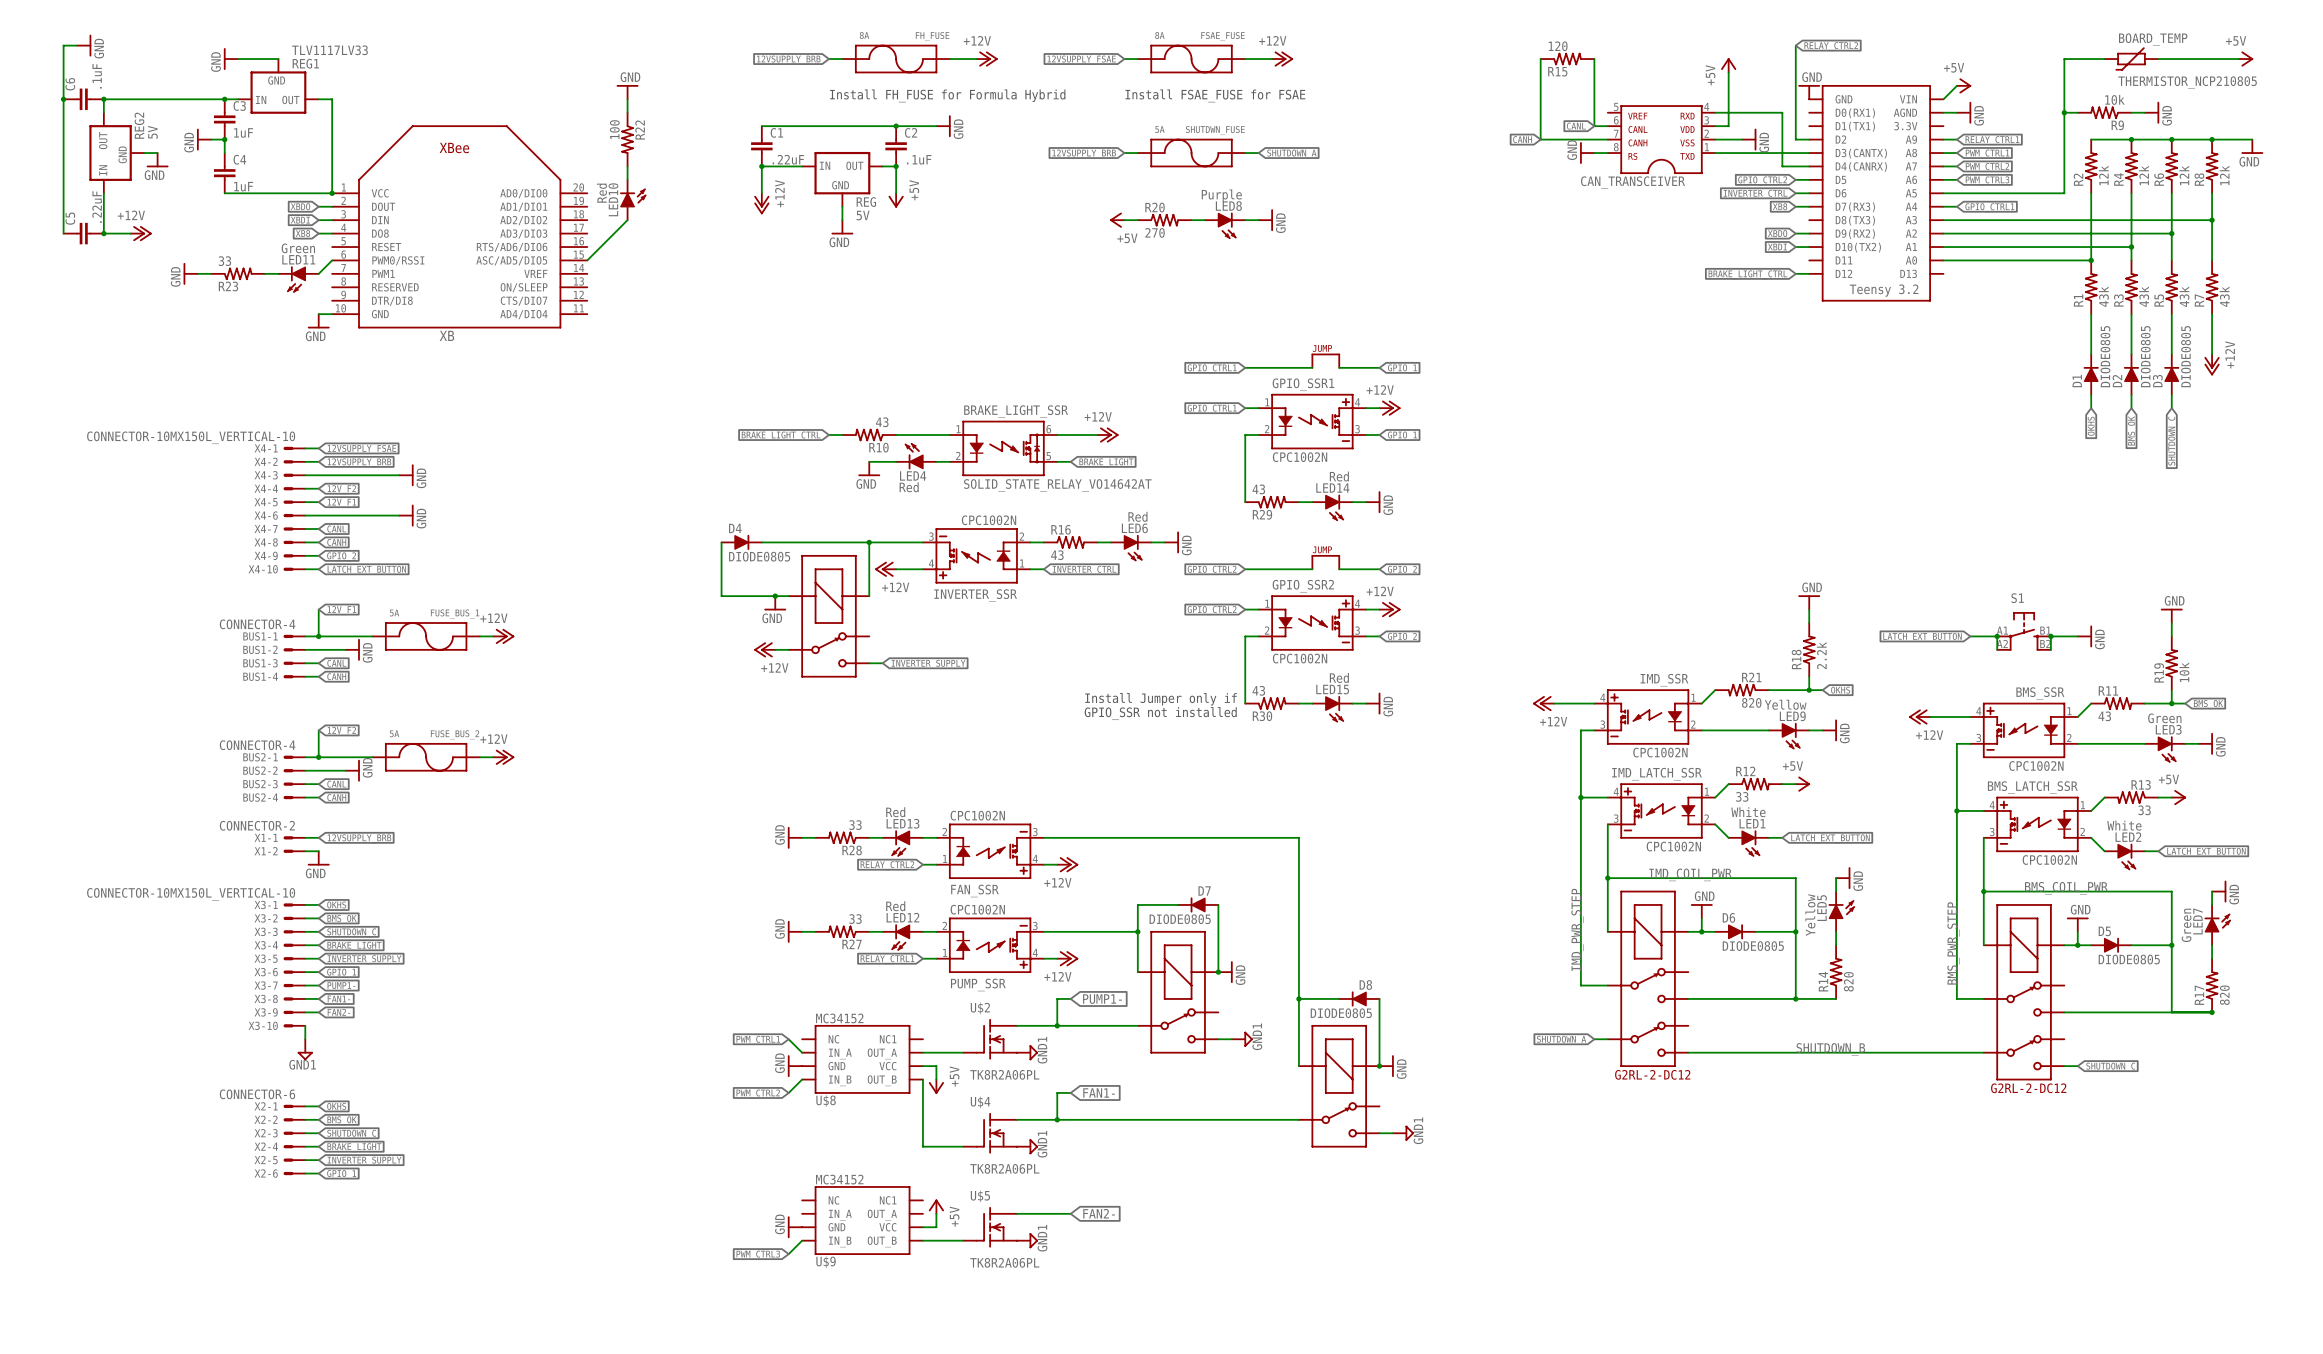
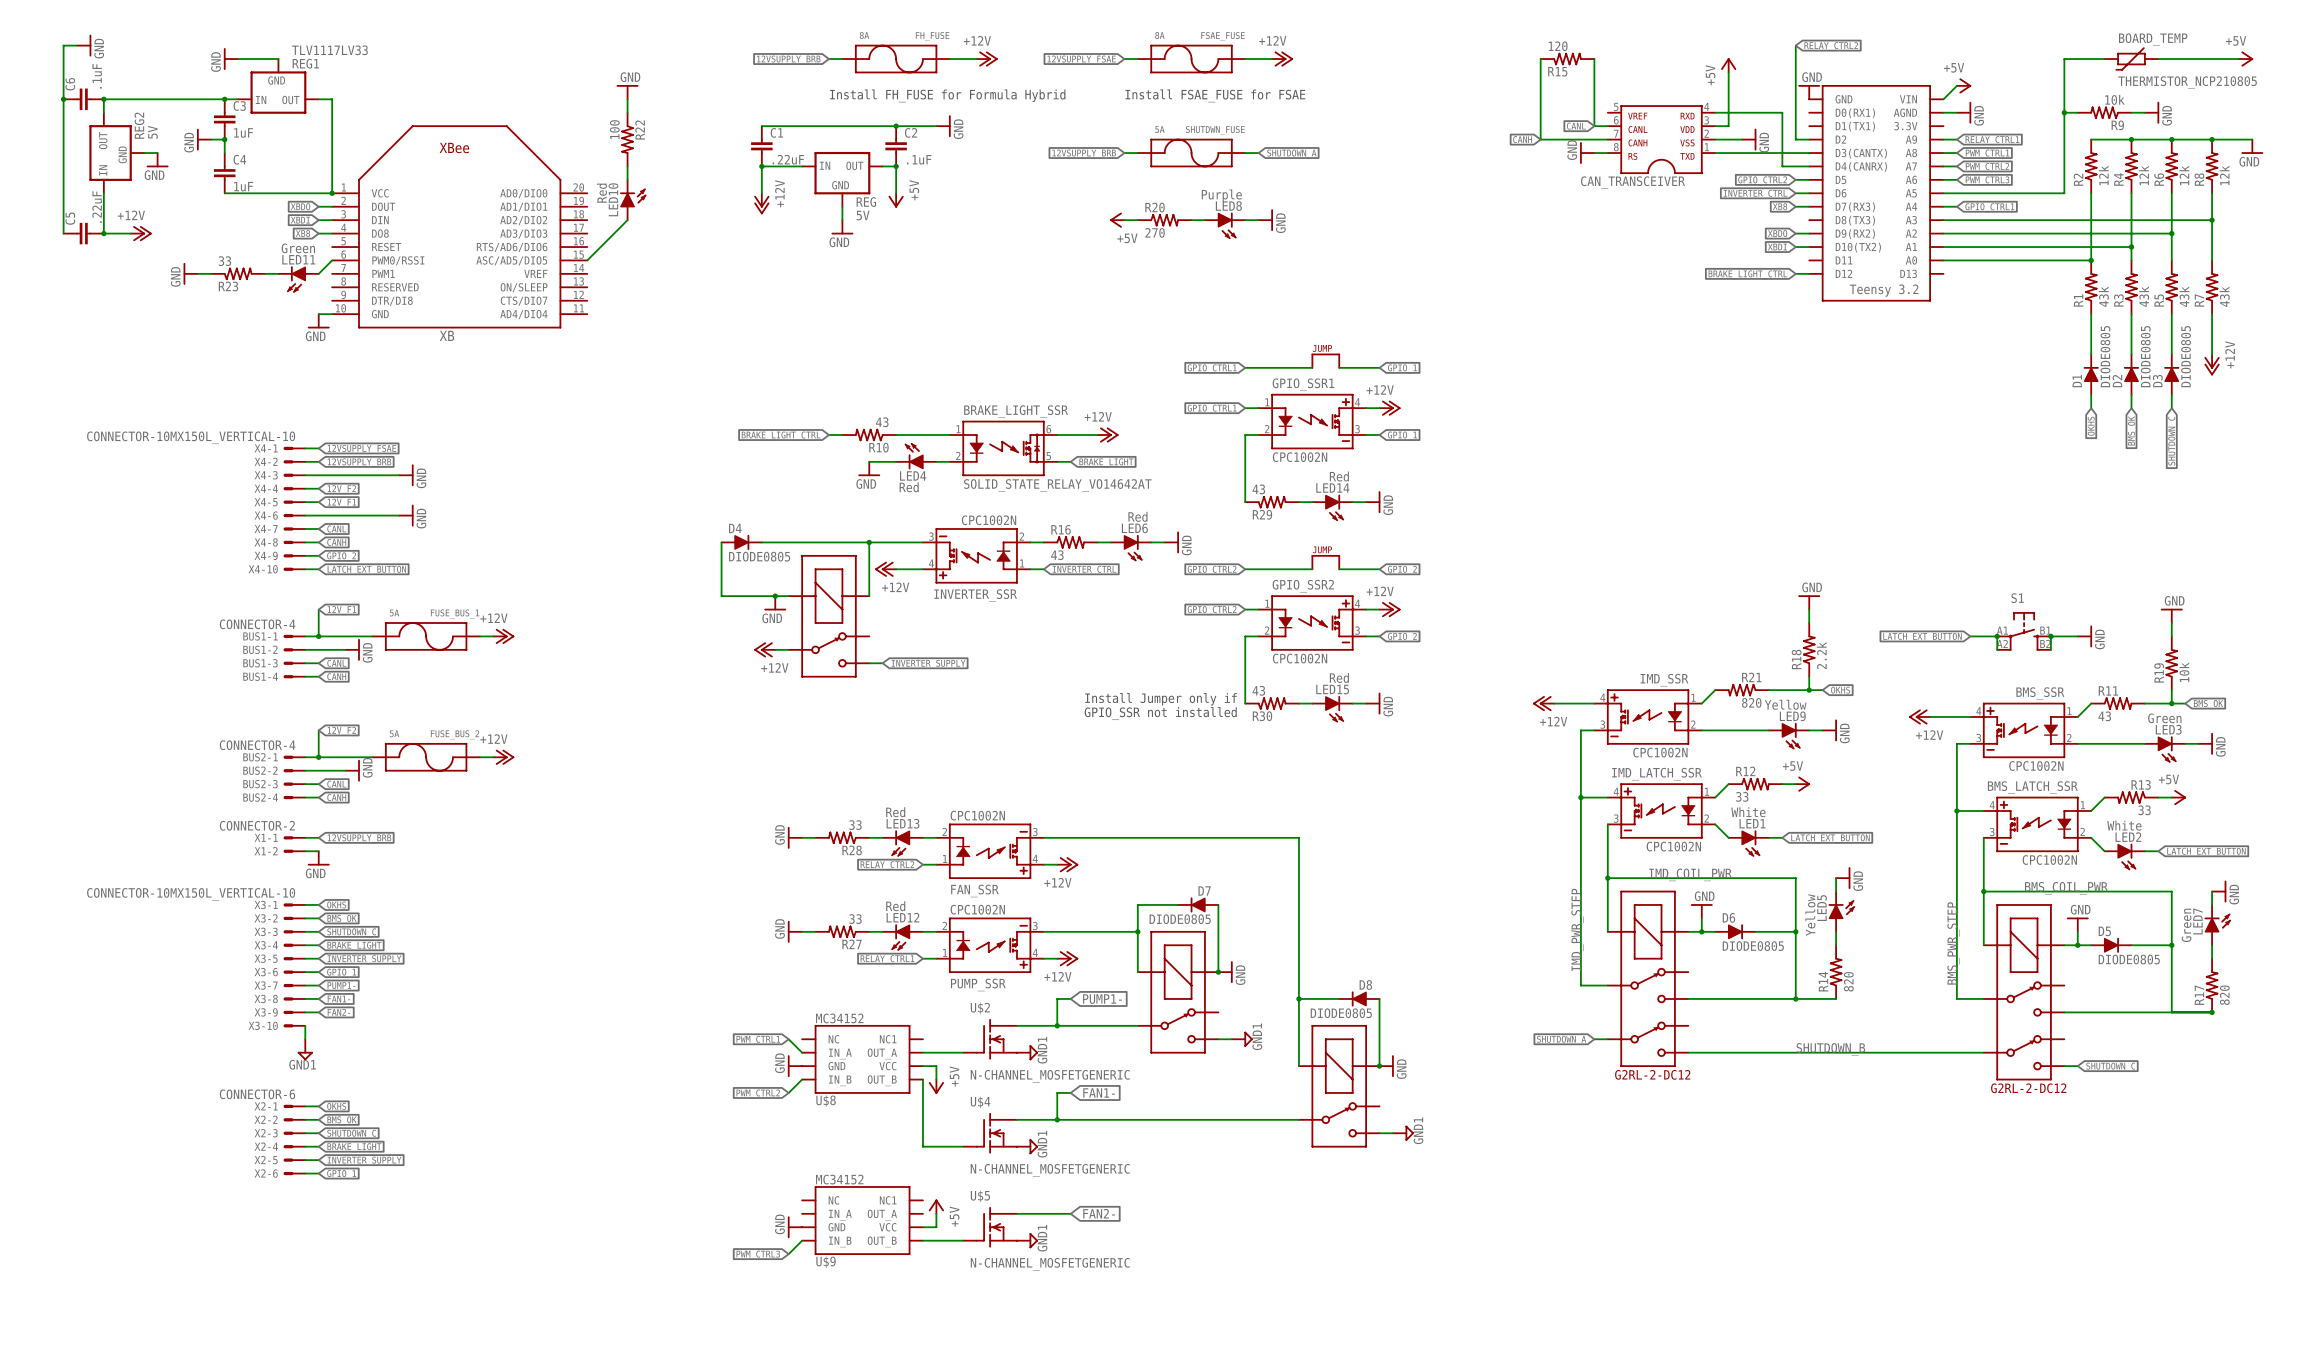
U$2 value: TK8R2A06PL (1004, 1074) -> N-CHANNEL_MOSFETGENERIC (1050, 1076)
U$4 value: TK8R2A06PL (1004, 1168) -> N-CHANNEL_MOSFETGENERIC (1050, 1170)
U$5 value: TK8R2A06PL (1004, 1262) -> N-CHANNEL_MOSFETGENERIC (1050, 1264)

